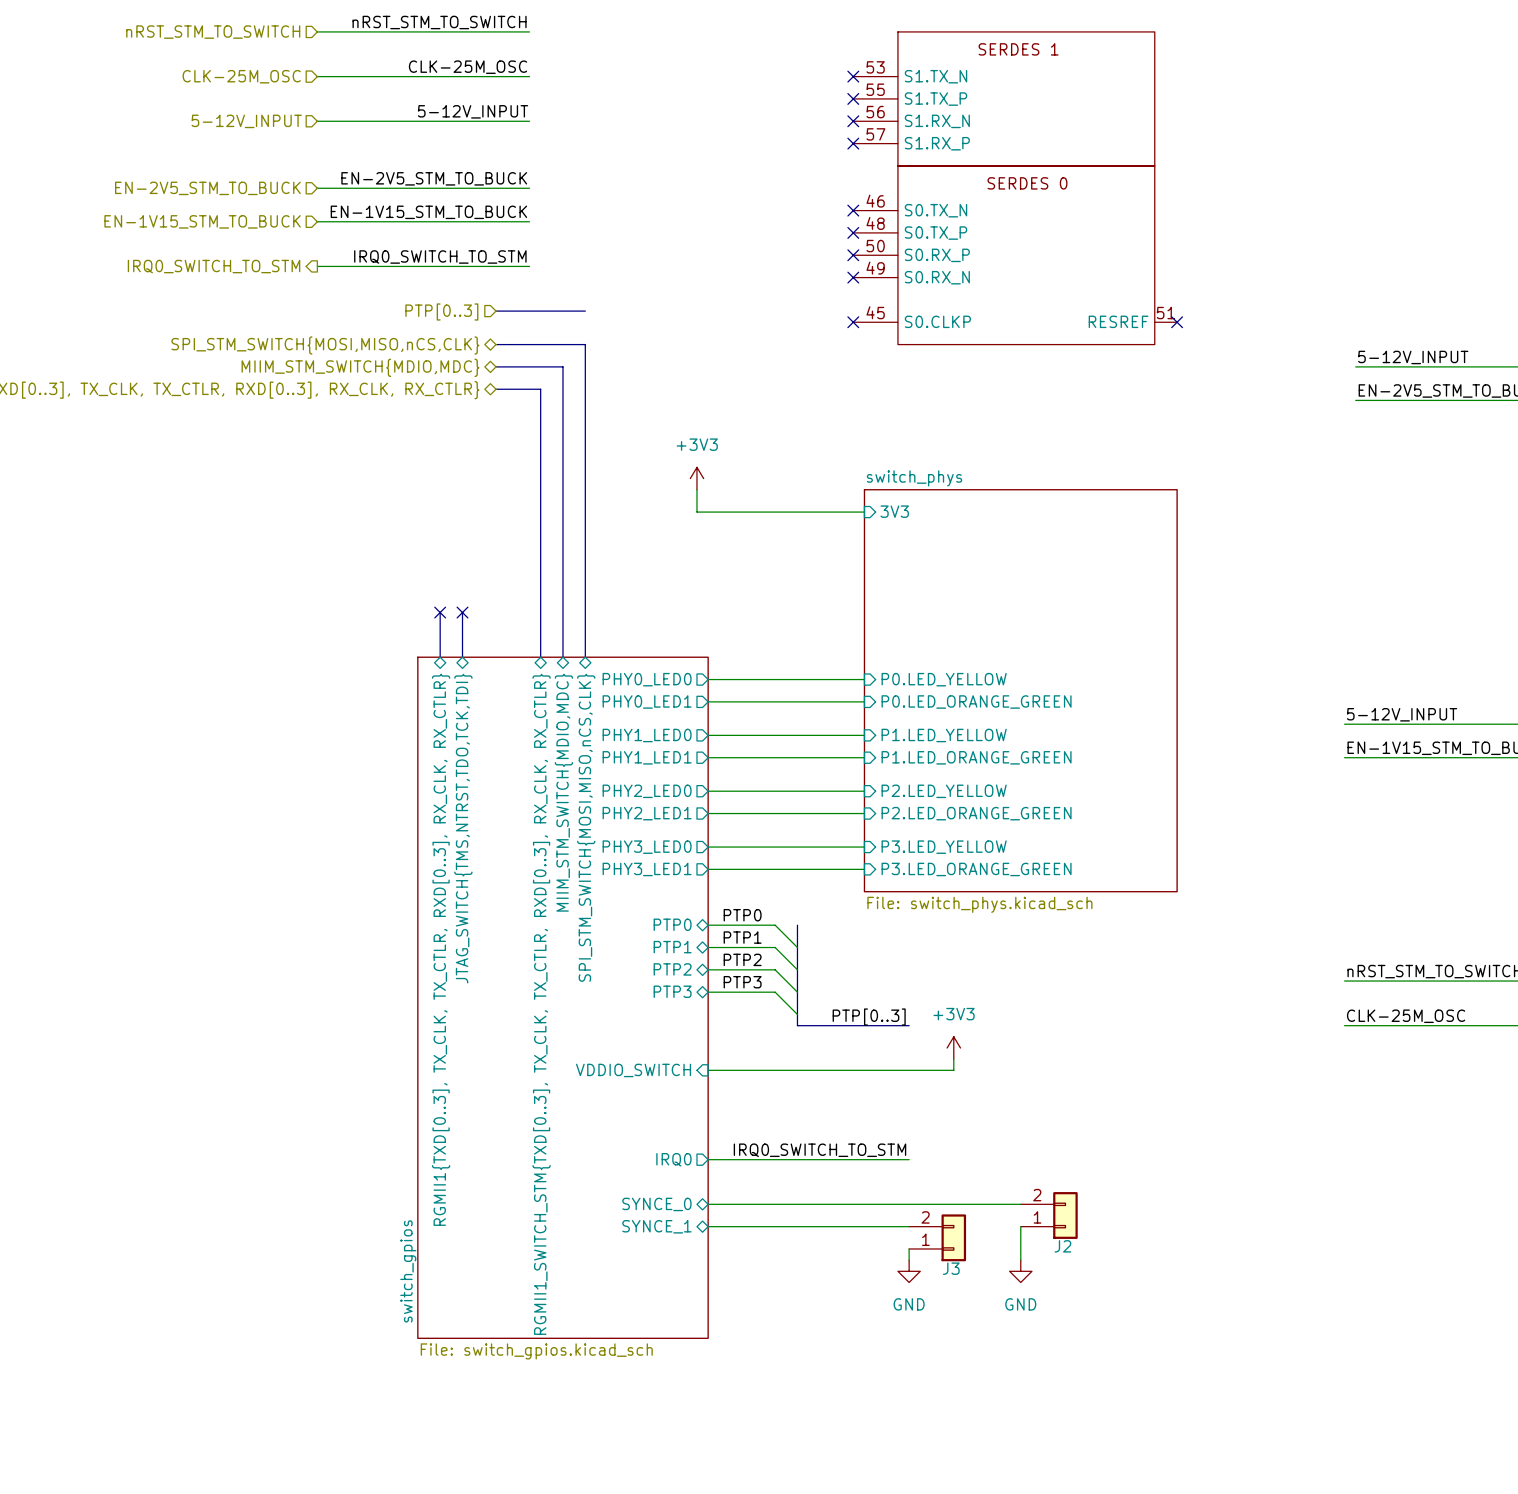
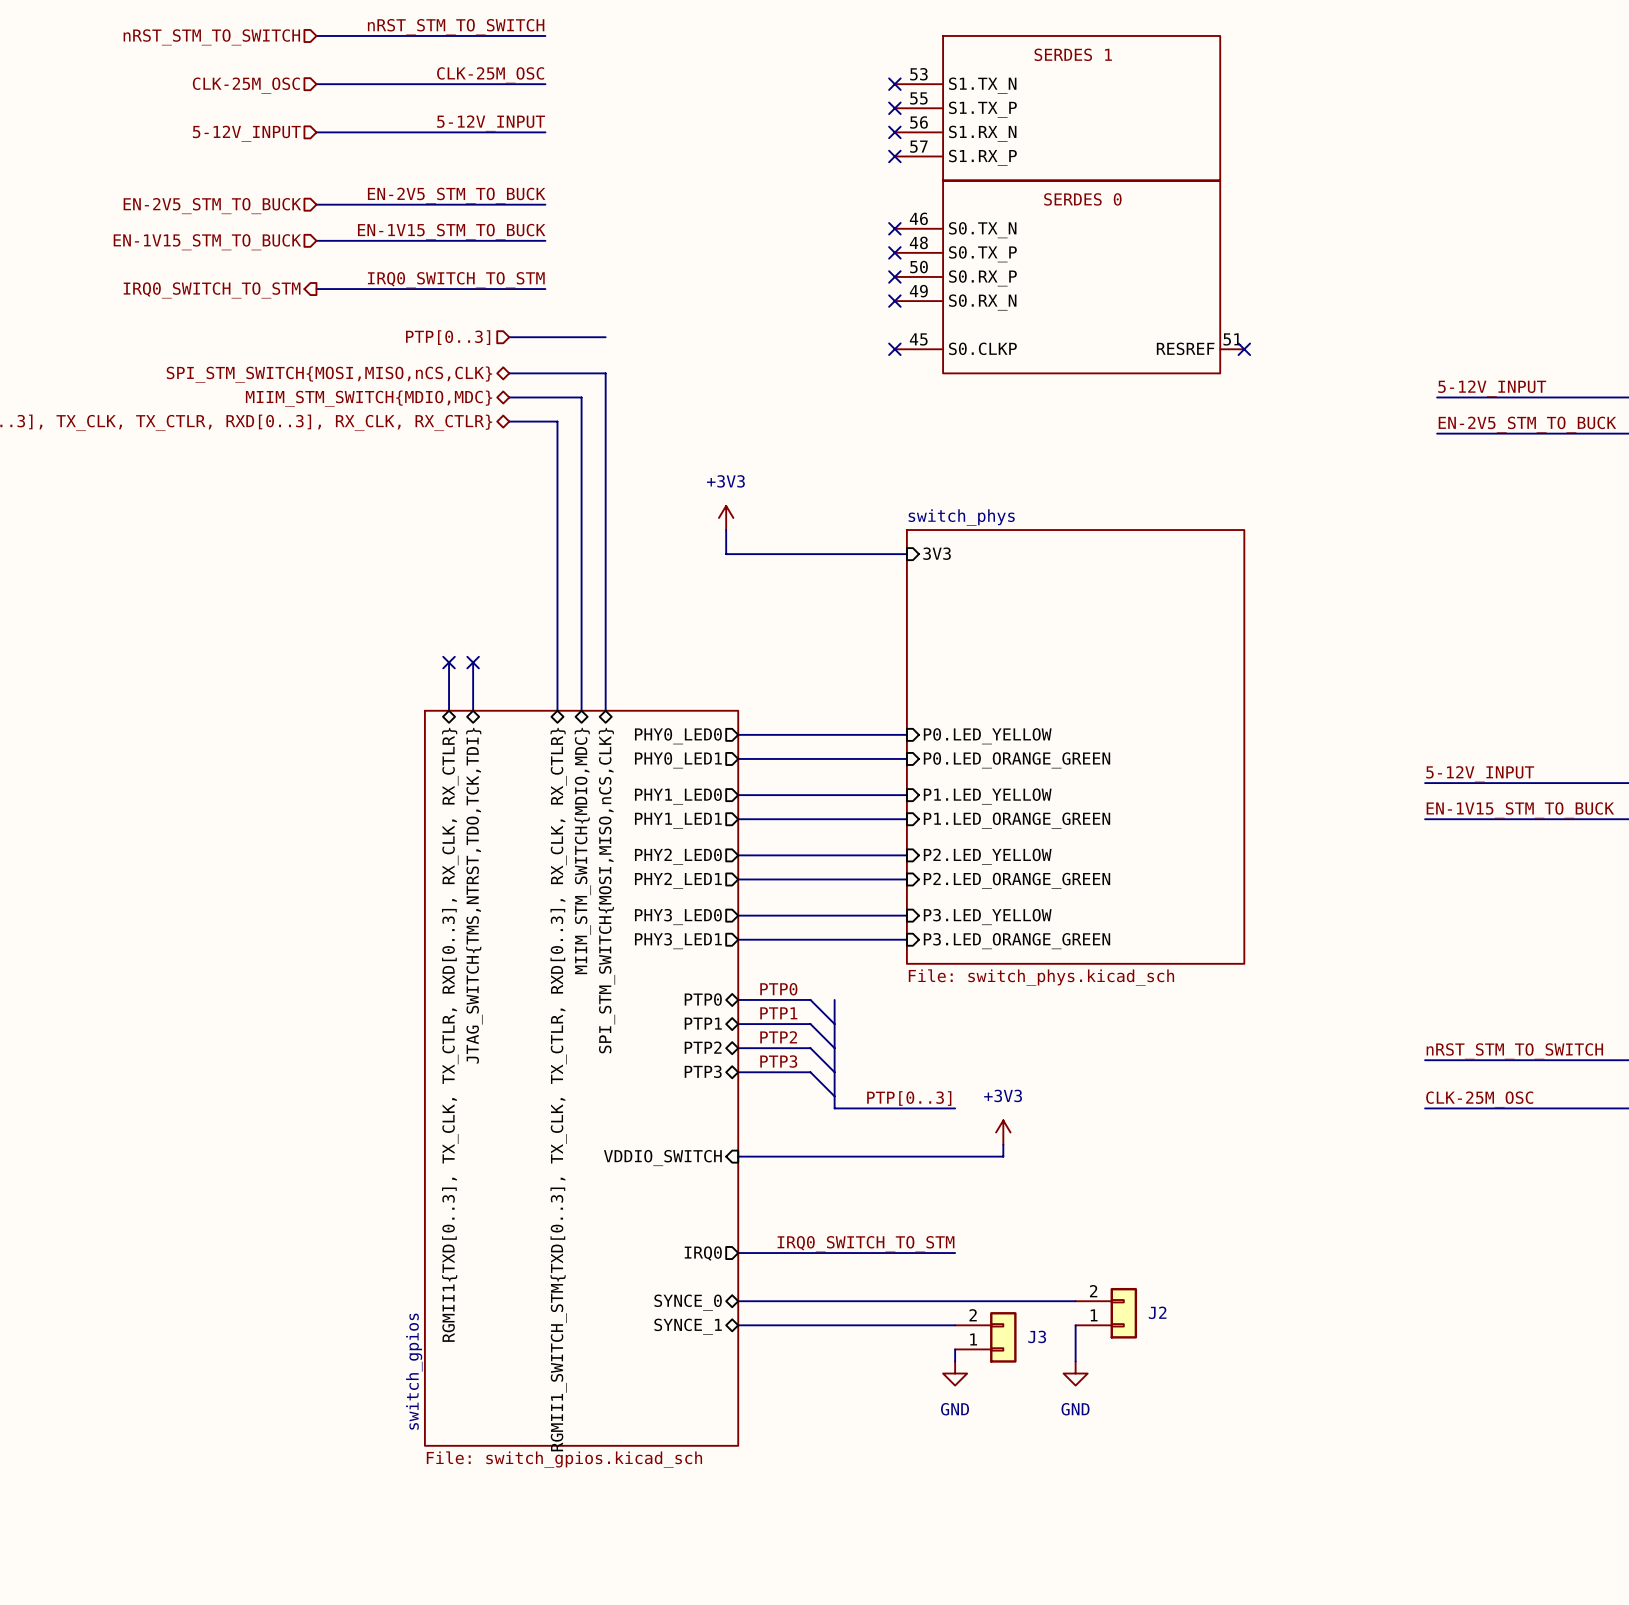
J2 name position: J2 (1062, 1246) -> J2 (1157, 1312)
J3 name position: J3 (951, 1268) -> J3 (1037, 1336)

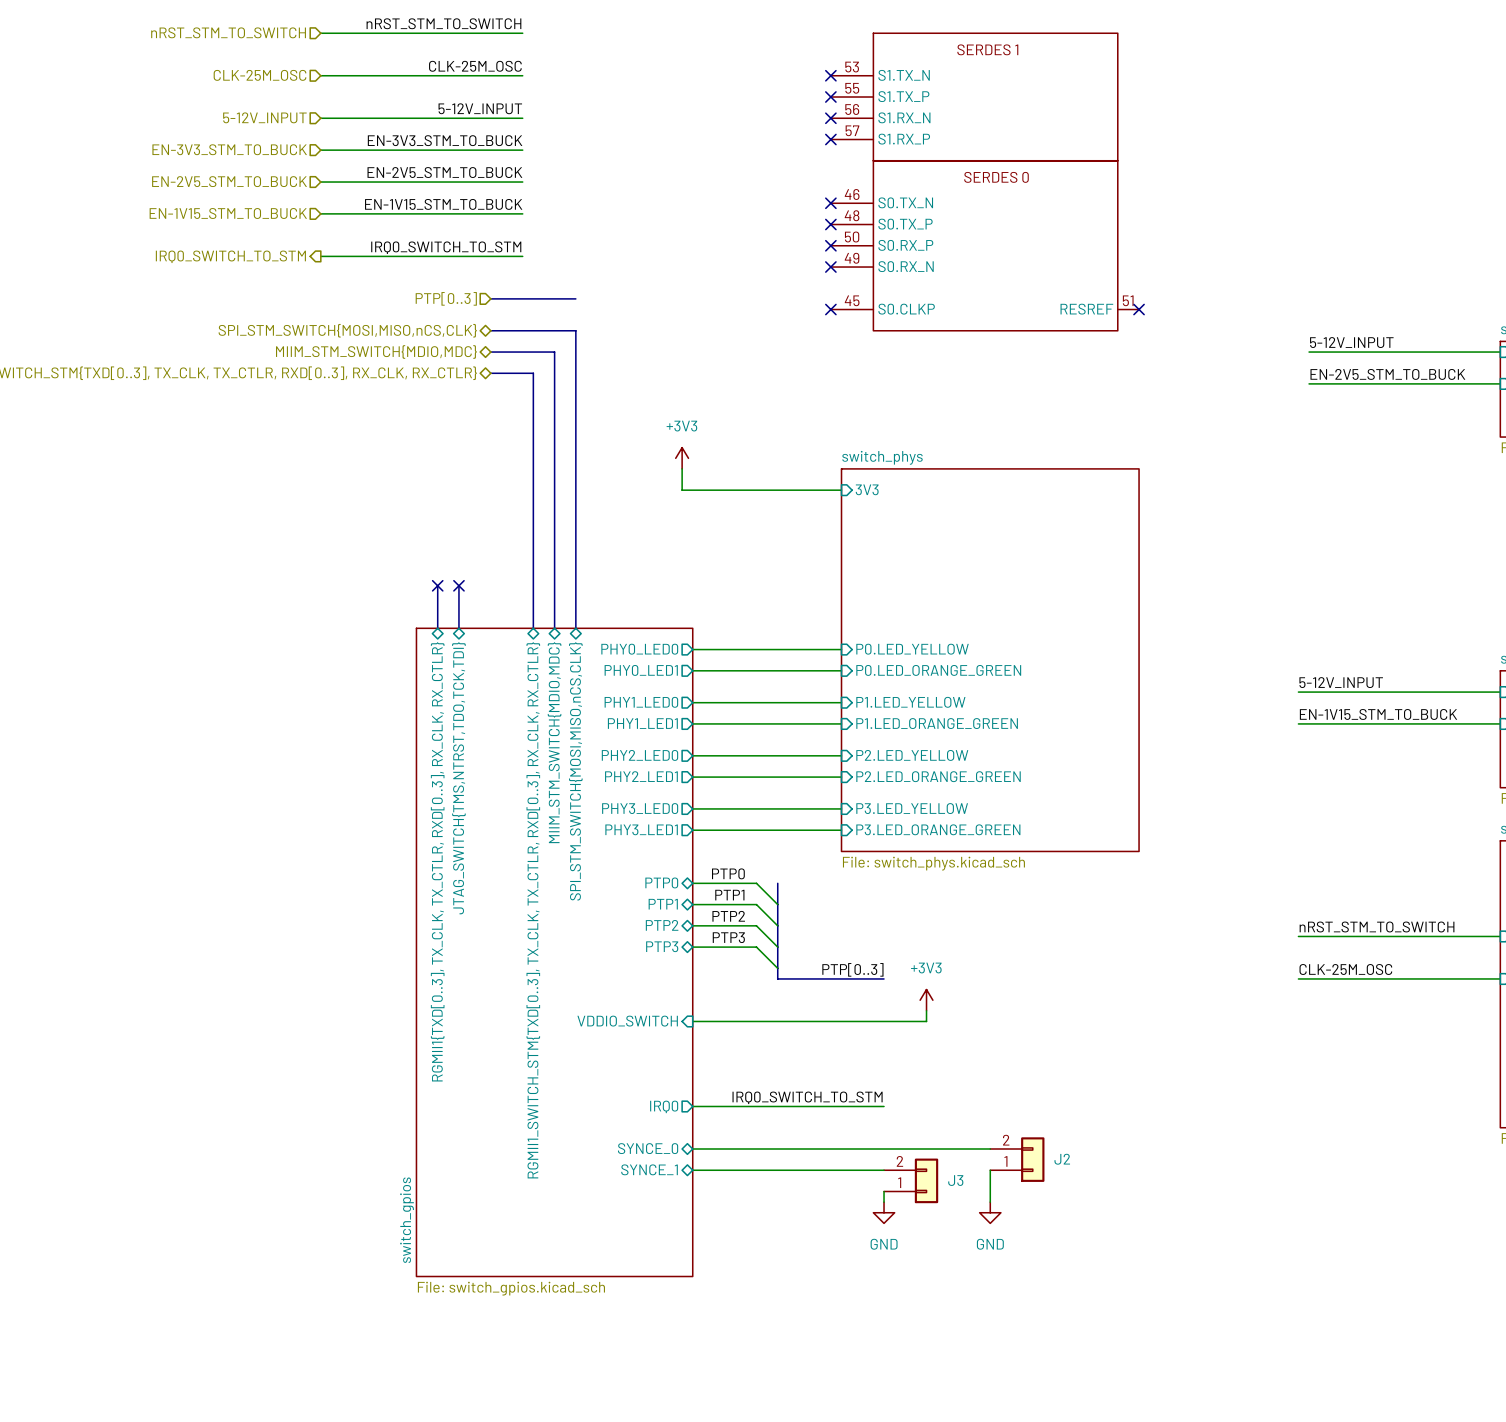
label: none -> EN-3V3_STM_TO_BUCK (445, 140)
wire: none -> (320, 150) (522, 150)
hierarchical label: none -> EN-3V3_STM_TO_BUCK (229, 149)

